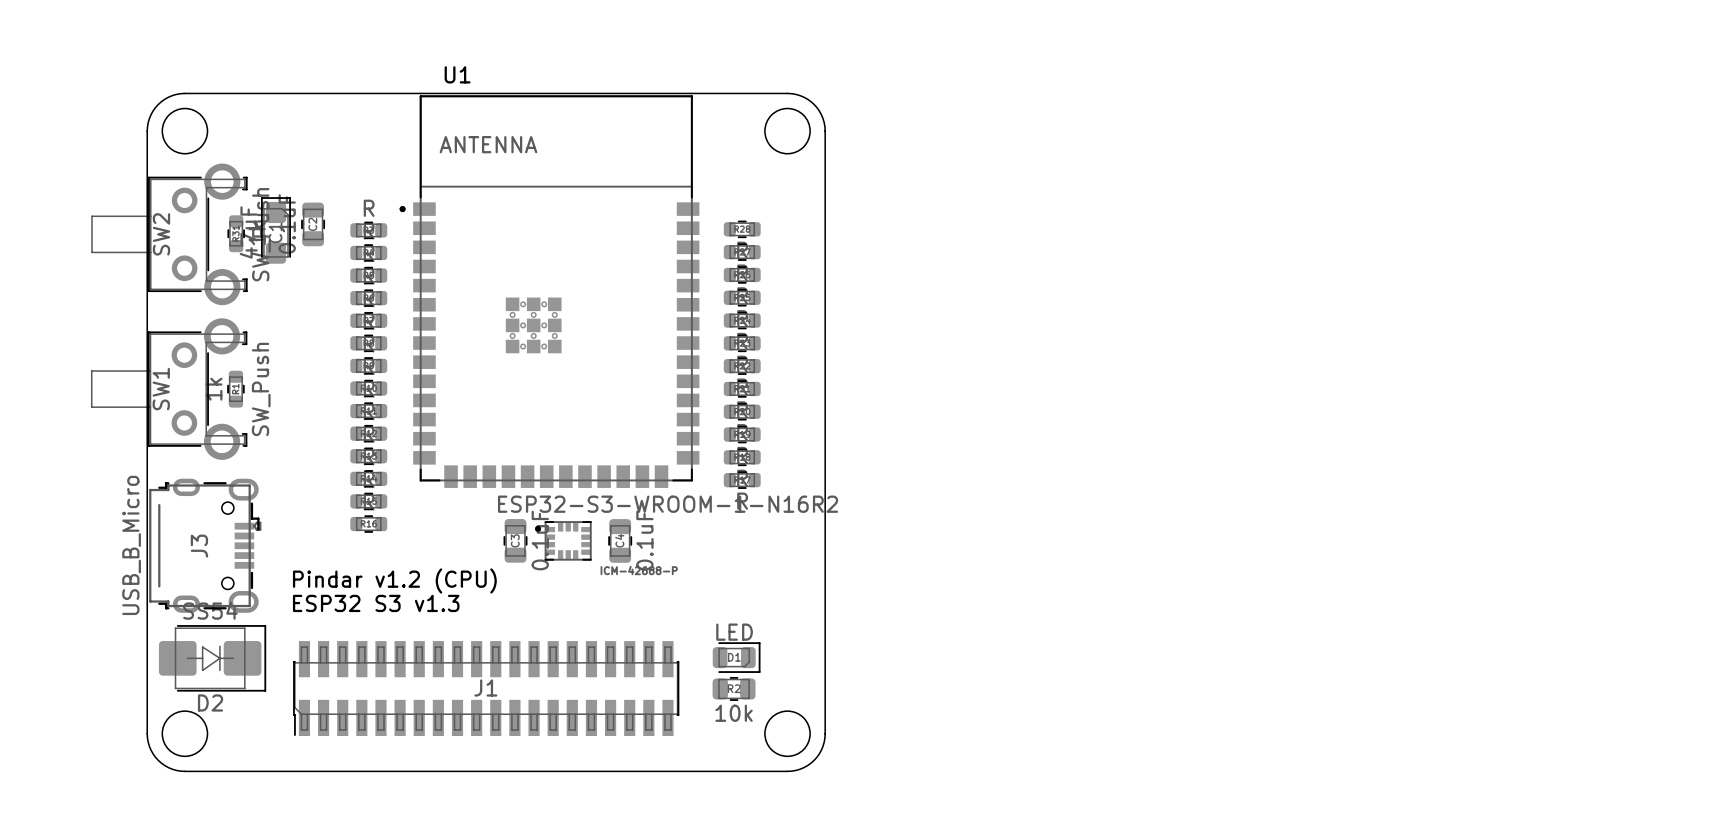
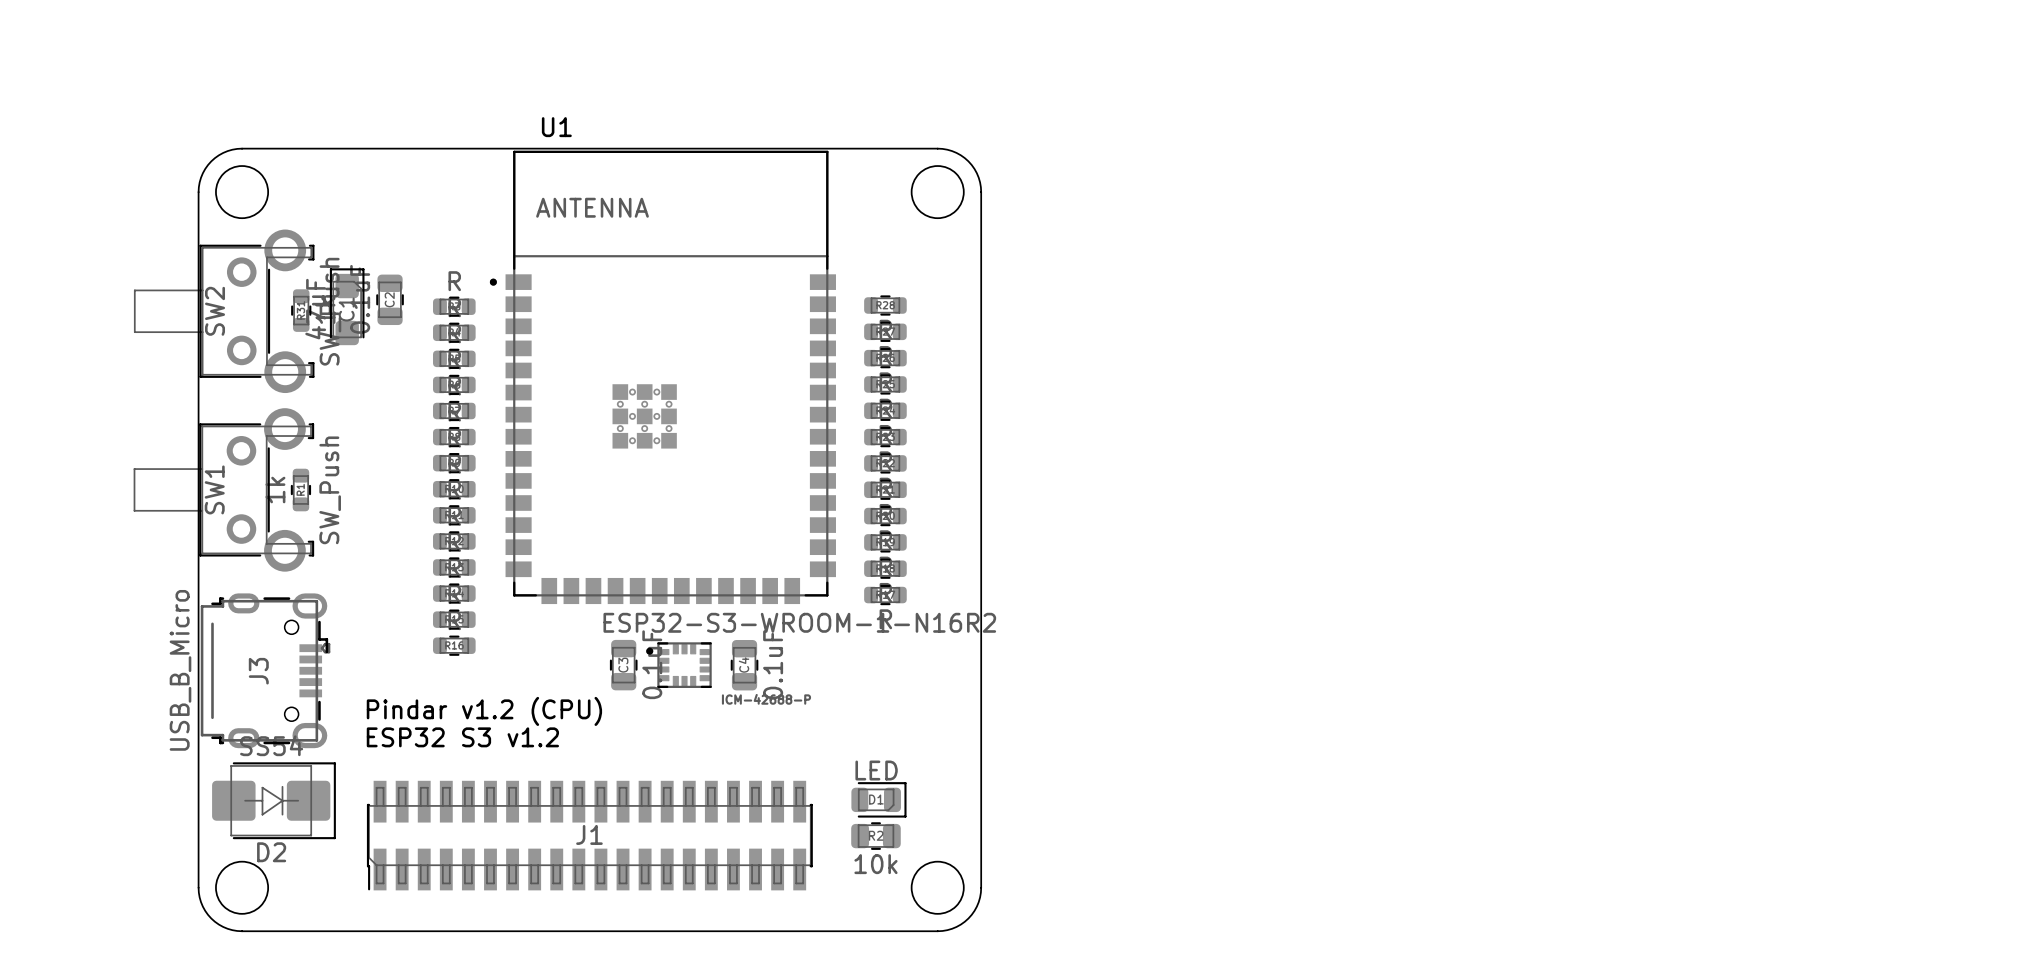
text: ESP32 S3 v1.3 (376, 603) -> ESP32 S3 v1.2 (462, 737)

